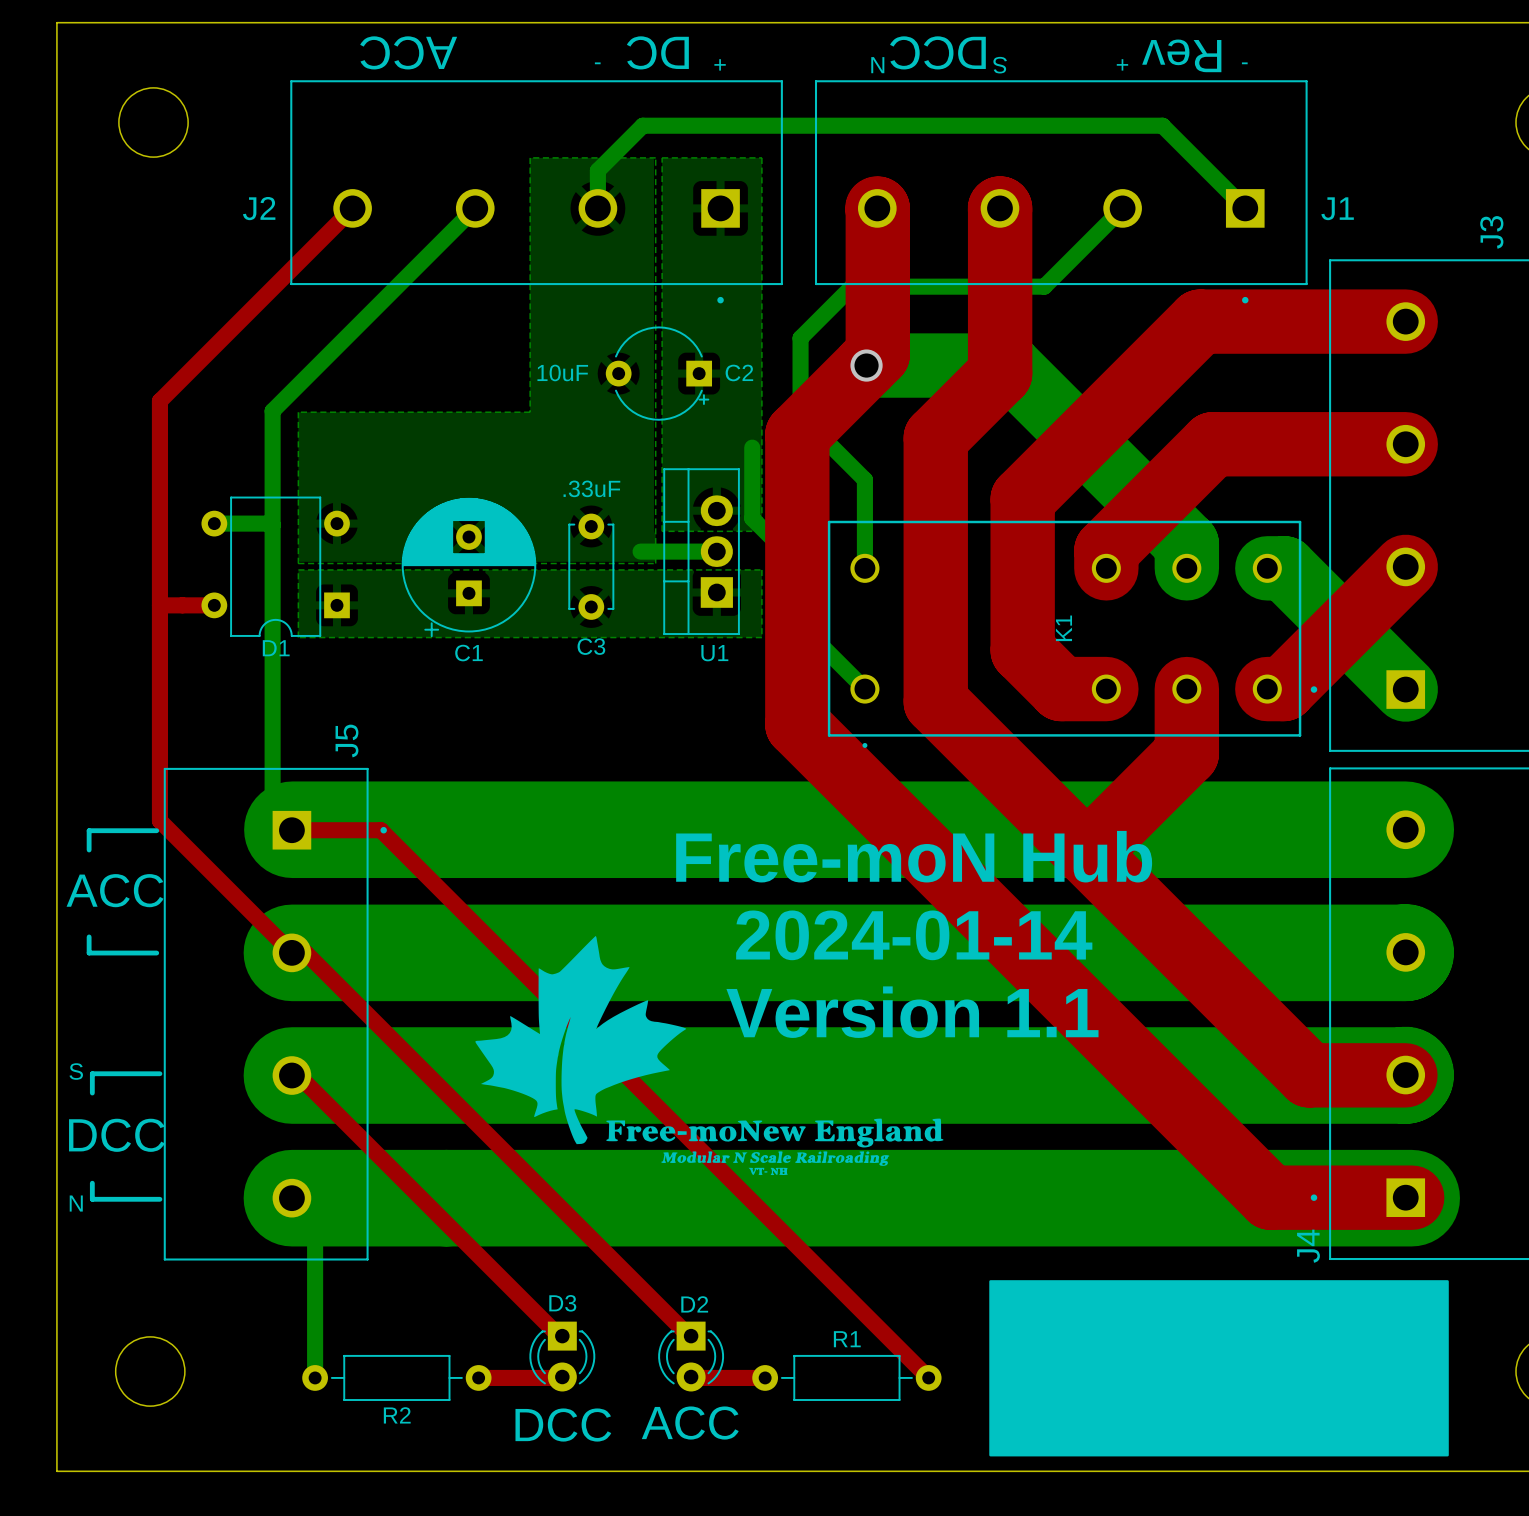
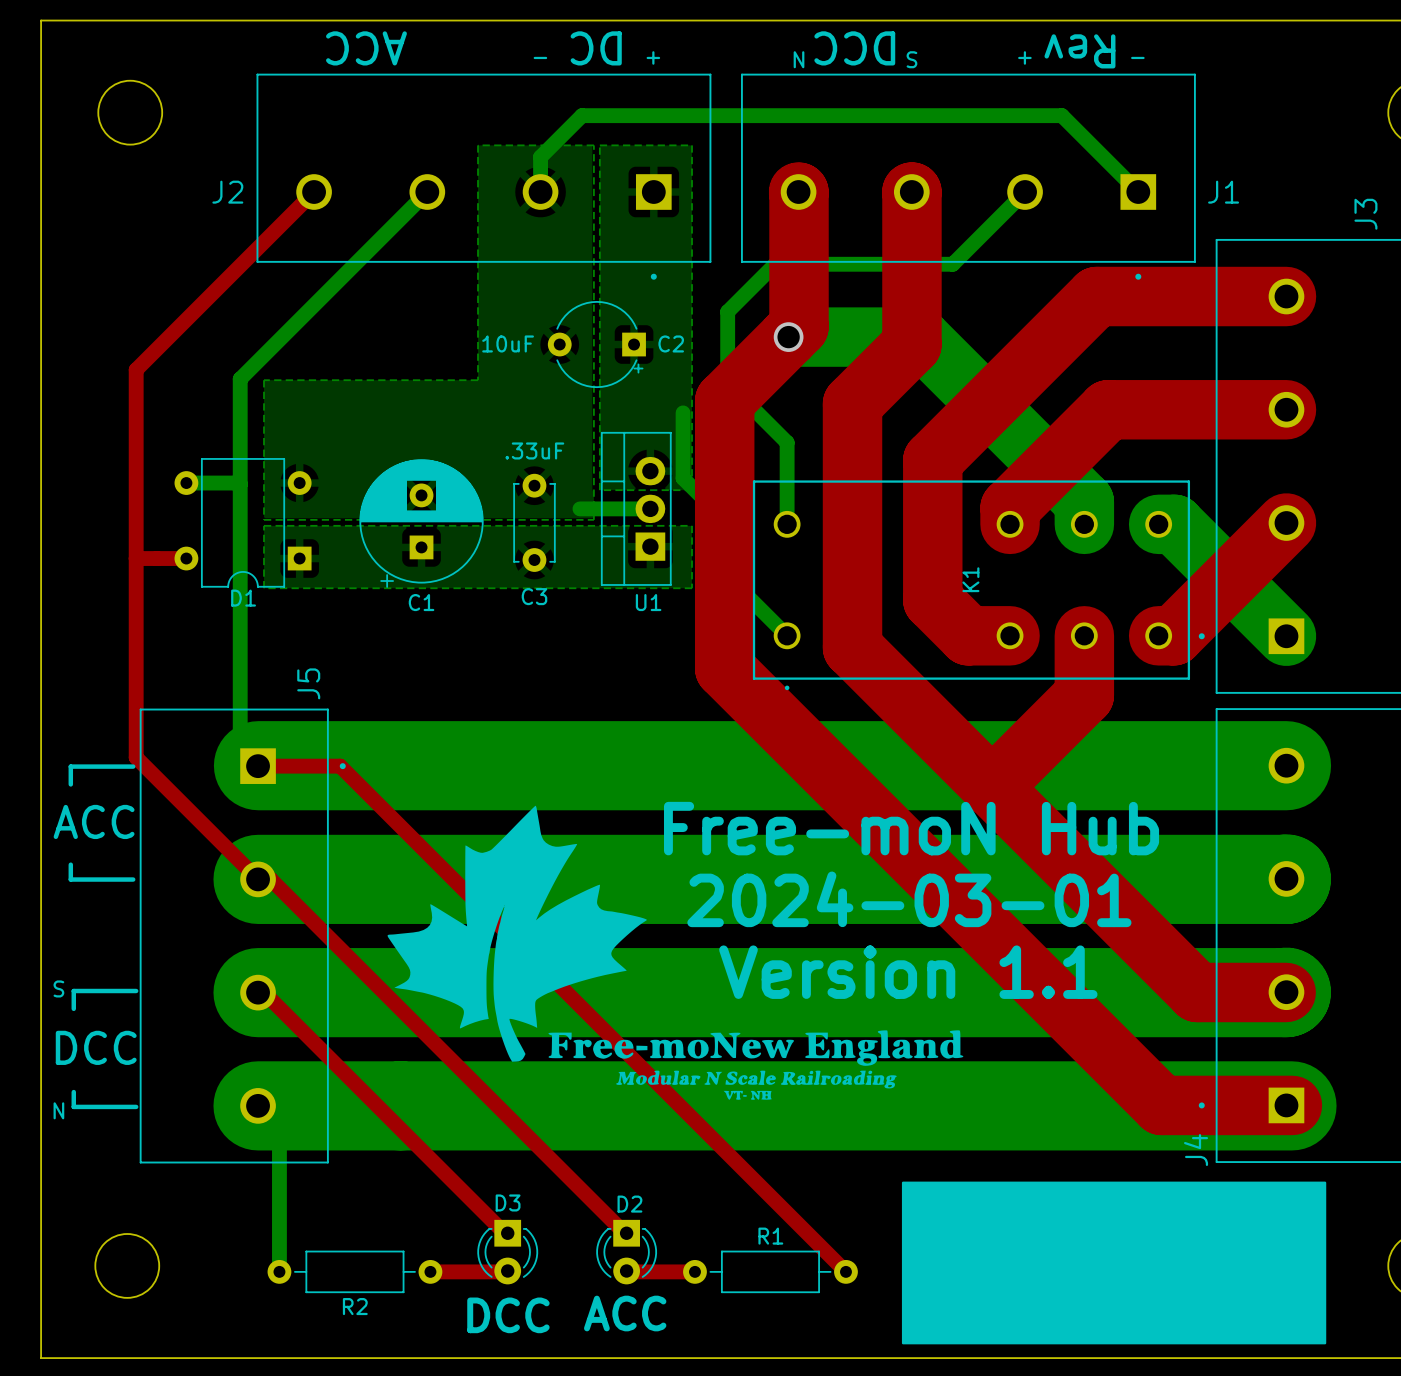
text position: Free-moN Hub (914, 856) -> Free-moN Hub (911, 828)
drawing: none -> [387, 805, 964, 1100]
text: 2024-01-14 (914, 935) -> 2024-03-01 (909, 899)
drawing: [475, 936, 944, 1176] -> none
text position: Version 1.1 (912, 1012) -> Version 1.1 (908, 972)

